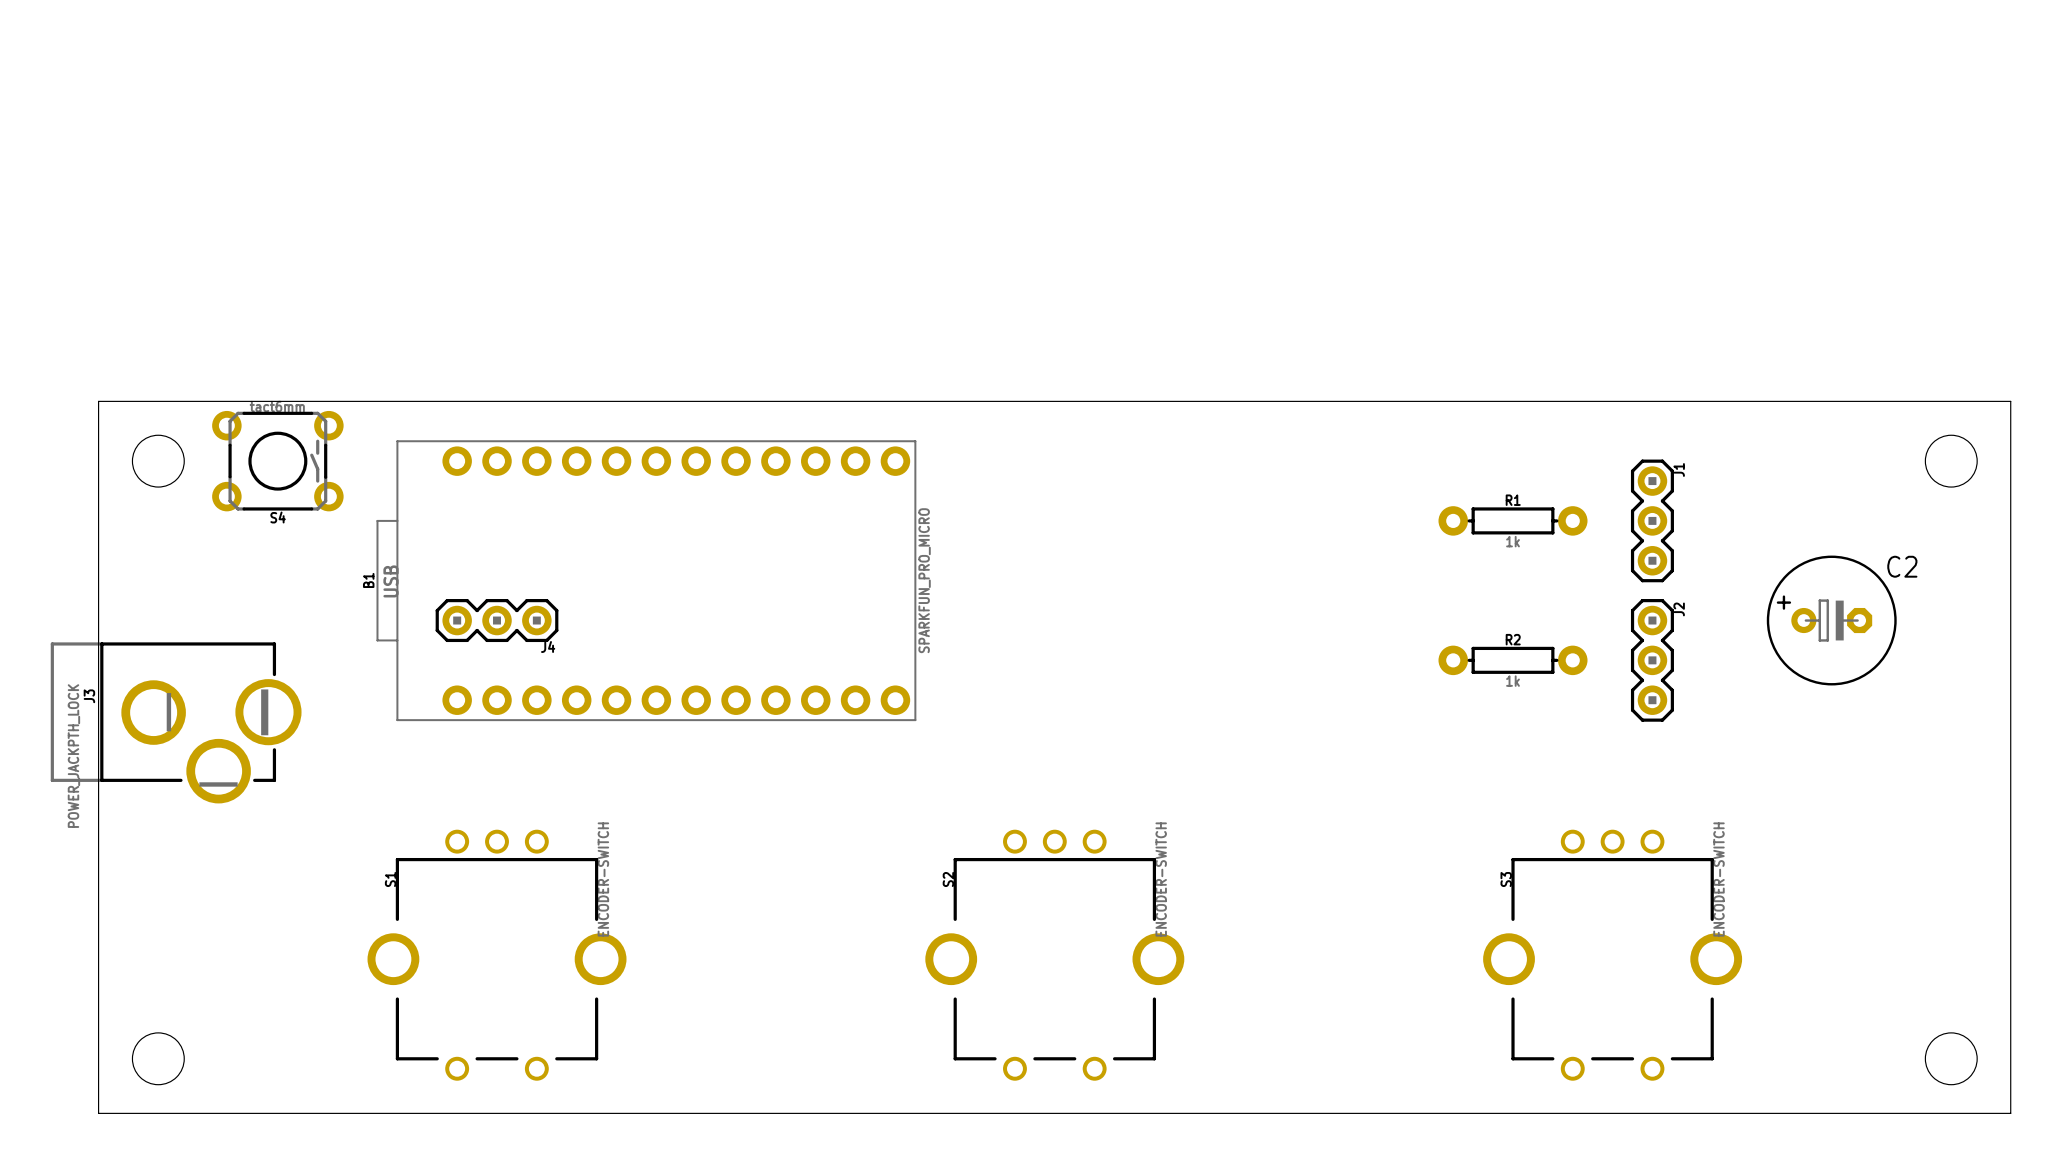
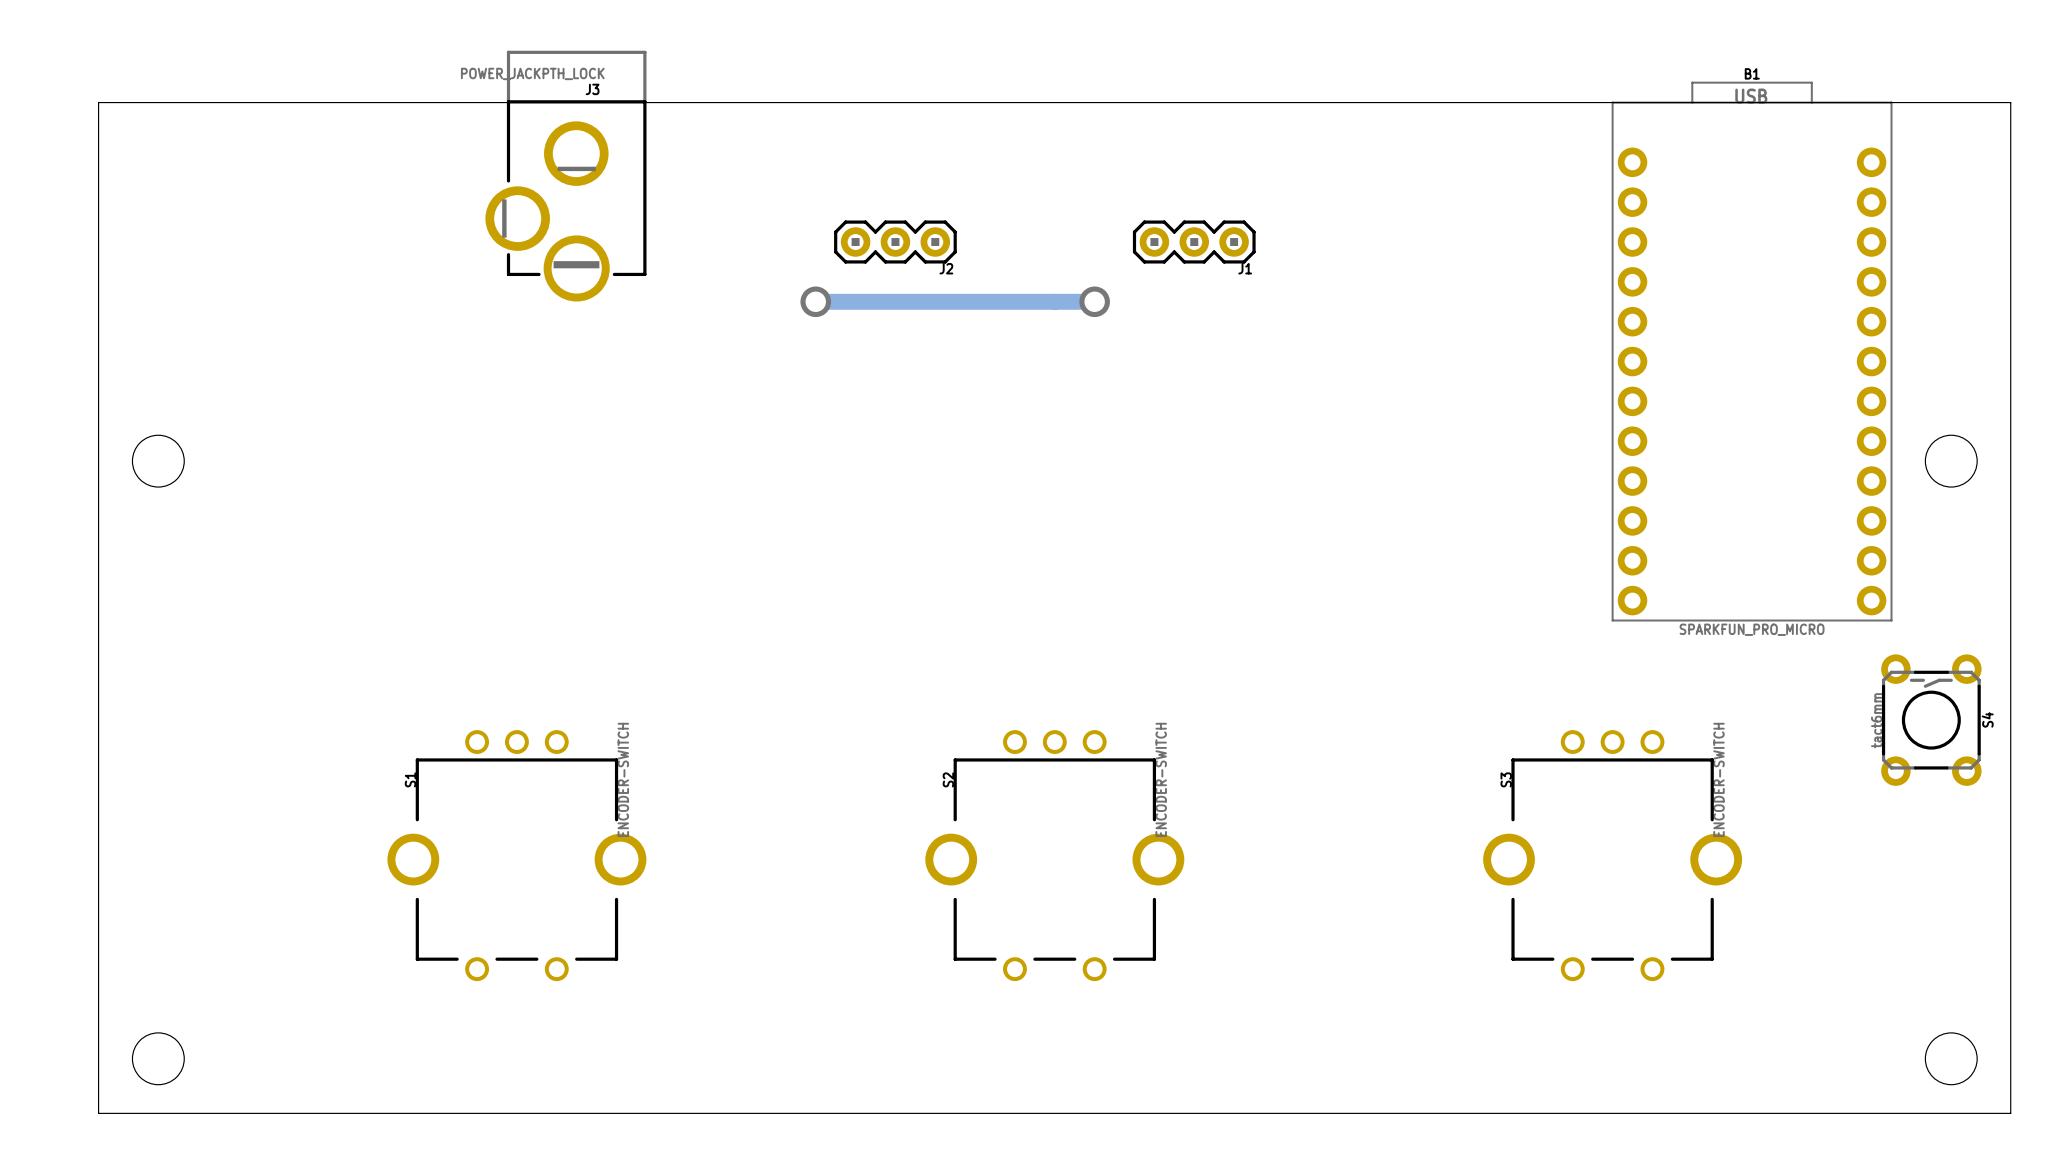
via: none -> (815, 301)
track: none -> (1094, 301) (815, 301)
via: none -> (1094, 301)
board edge: (2010, 401) (98, 401) -> (2010, 401) (2010, 102) (98, 102) (98, 401)
S4 rotation: 0° (277, 461) -> 90° counterclockwise (1931, 720)
S4 position: (277, 461) -> (1931, 720)
R1: 1k (1513, 520) -> none
J1 rotation: 0° (1652, 520) -> 90° clockwise (1194, 242)
J1 position: (1652, 520) -> (1194, 242)
B1 rotation: 0° (646, 580) -> 90° clockwise (1752, 351)
B1 position: (646, 580) -> (1752, 351)
J4: (497, 620) -> none
C2: (1831, 620) -> none
R2: 1k (1513, 660) -> none
J2 rotation: 0° (1652, 660) -> 90° clockwise (895, 242)
J2 position: (1652, 660) -> (895, 242)
J3 rotation: 0° (176, 722) -> 90° clockwise (565, 176)
J3 position: (176, 722) -> (565, 176)
S1 position: (497, 955) -> (516, 855)
S2 position: (1054, 955) -> (1054, 855)
S3 position: (1612, 955) -> (1612, 855)

